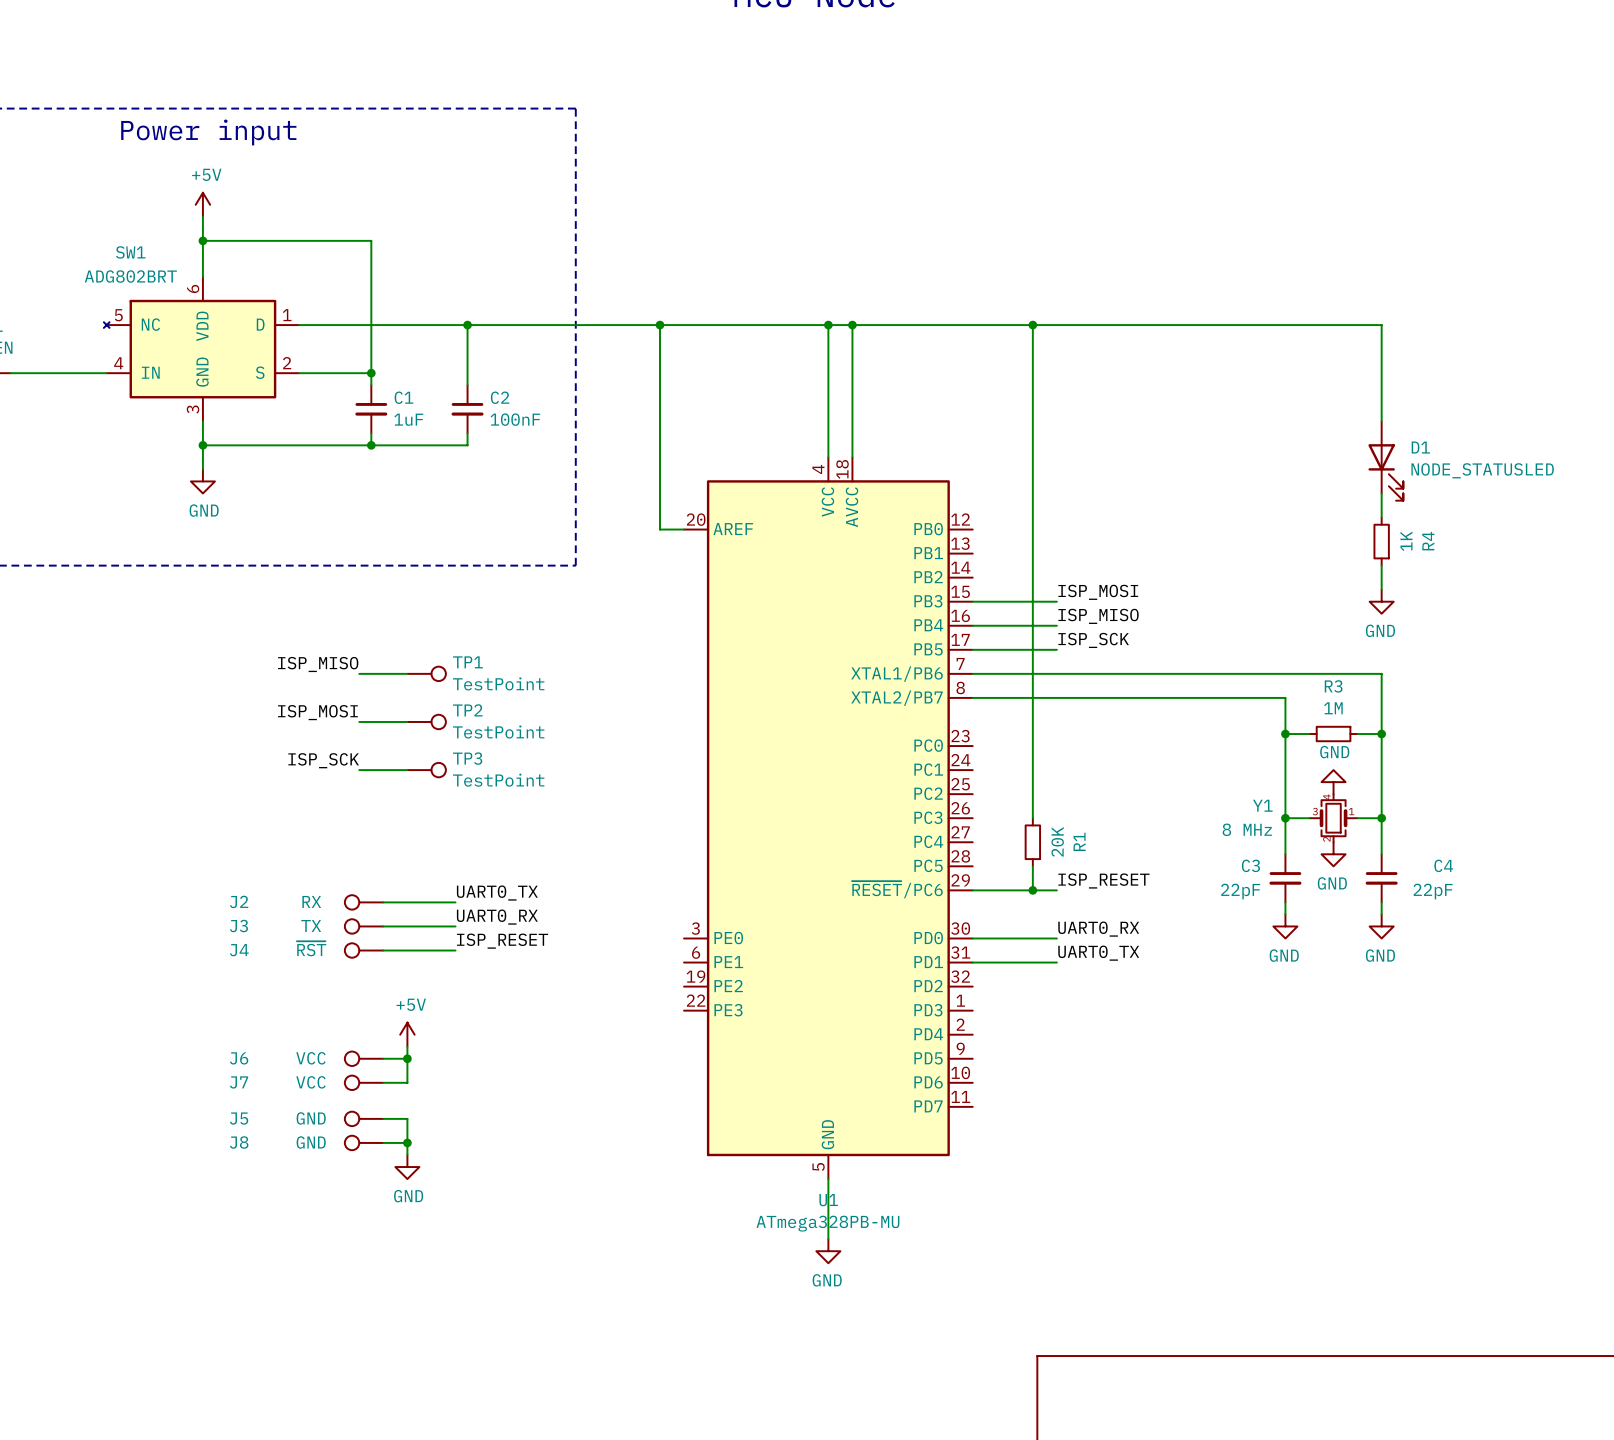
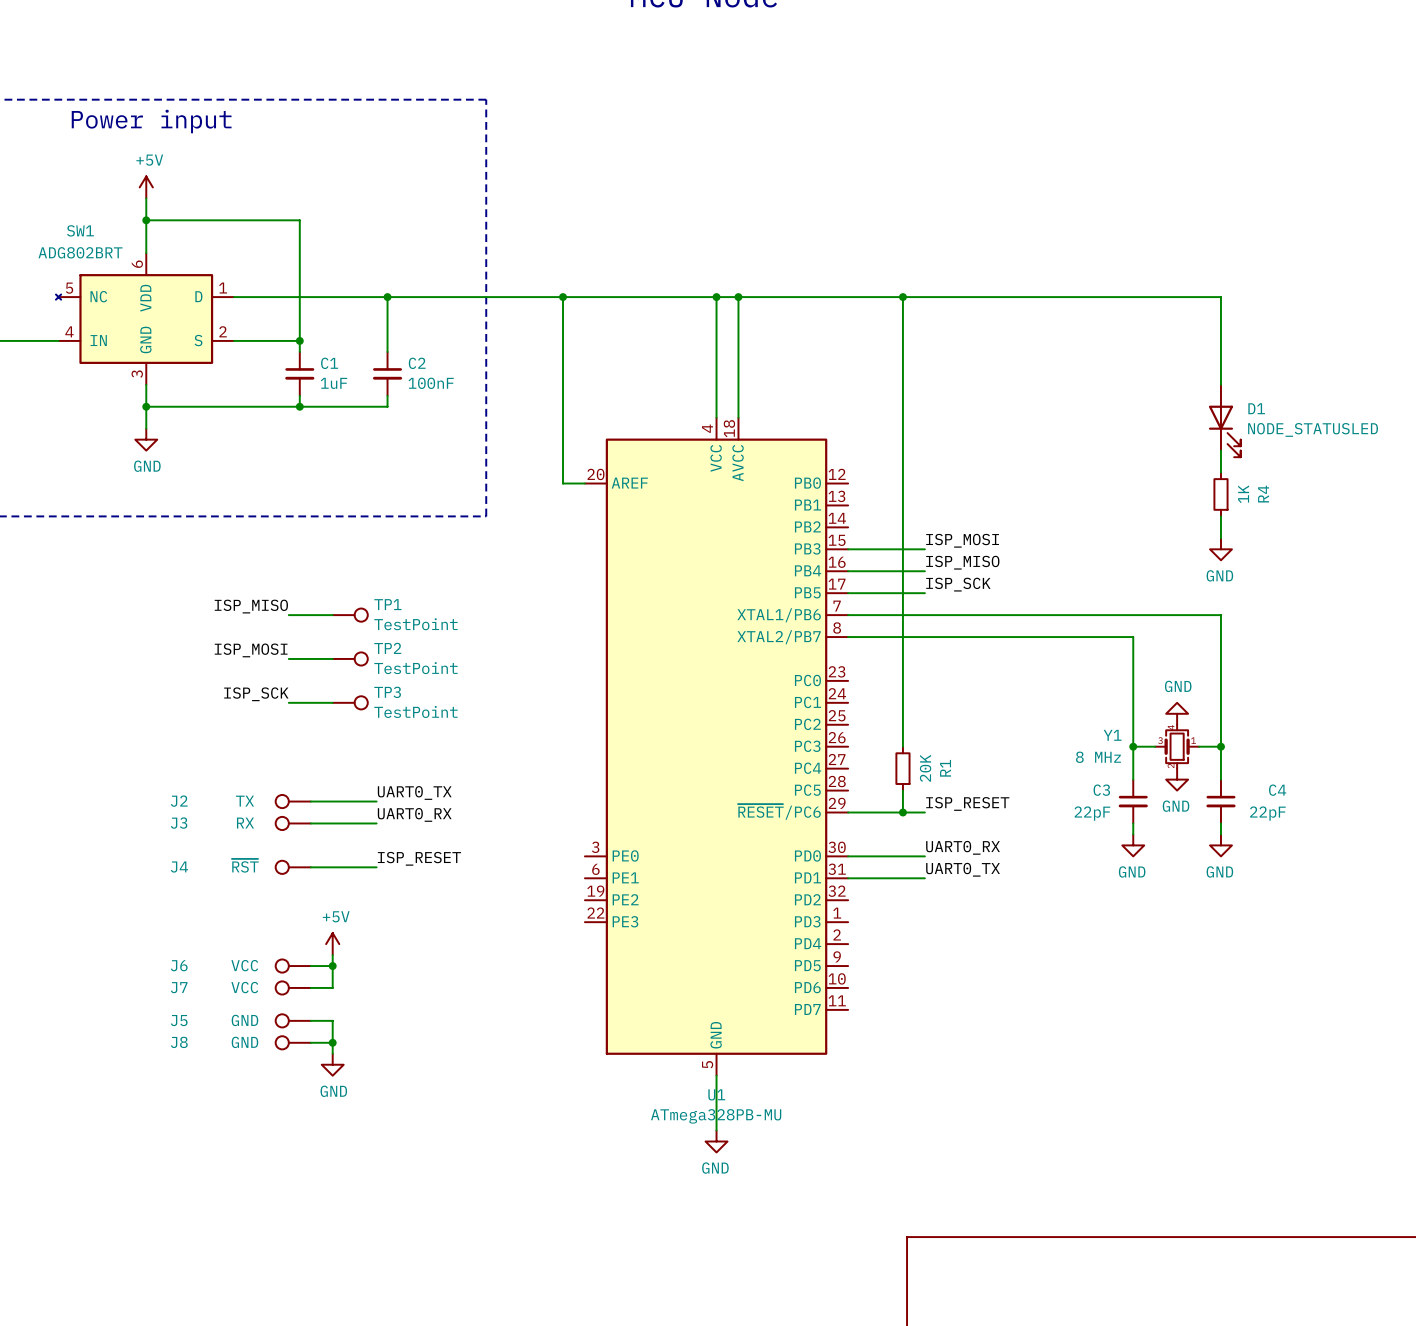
wire: (1285, 734) (1309, 734) -> none
junction: (1285, 734) -> none
R3: 1M (1333, 734) -> none
wire: (1357, 734) (1381, 734) -> none
junction: (1381, 734) -> none
label: none -> UART0_TX (414, 792)
J2: none -> TX (293, 801)
label: UART0_TX (497, 893) -> UART0_RX (414, 814)
J2 name: J2 (239, 901) -> J3 (179, 823)
label: UART0_RX (497, 917) -> none
J3: TX (364, 926) -> none
wire: (383, 926) (455, 926) -> (310, 801) (376, 801)

